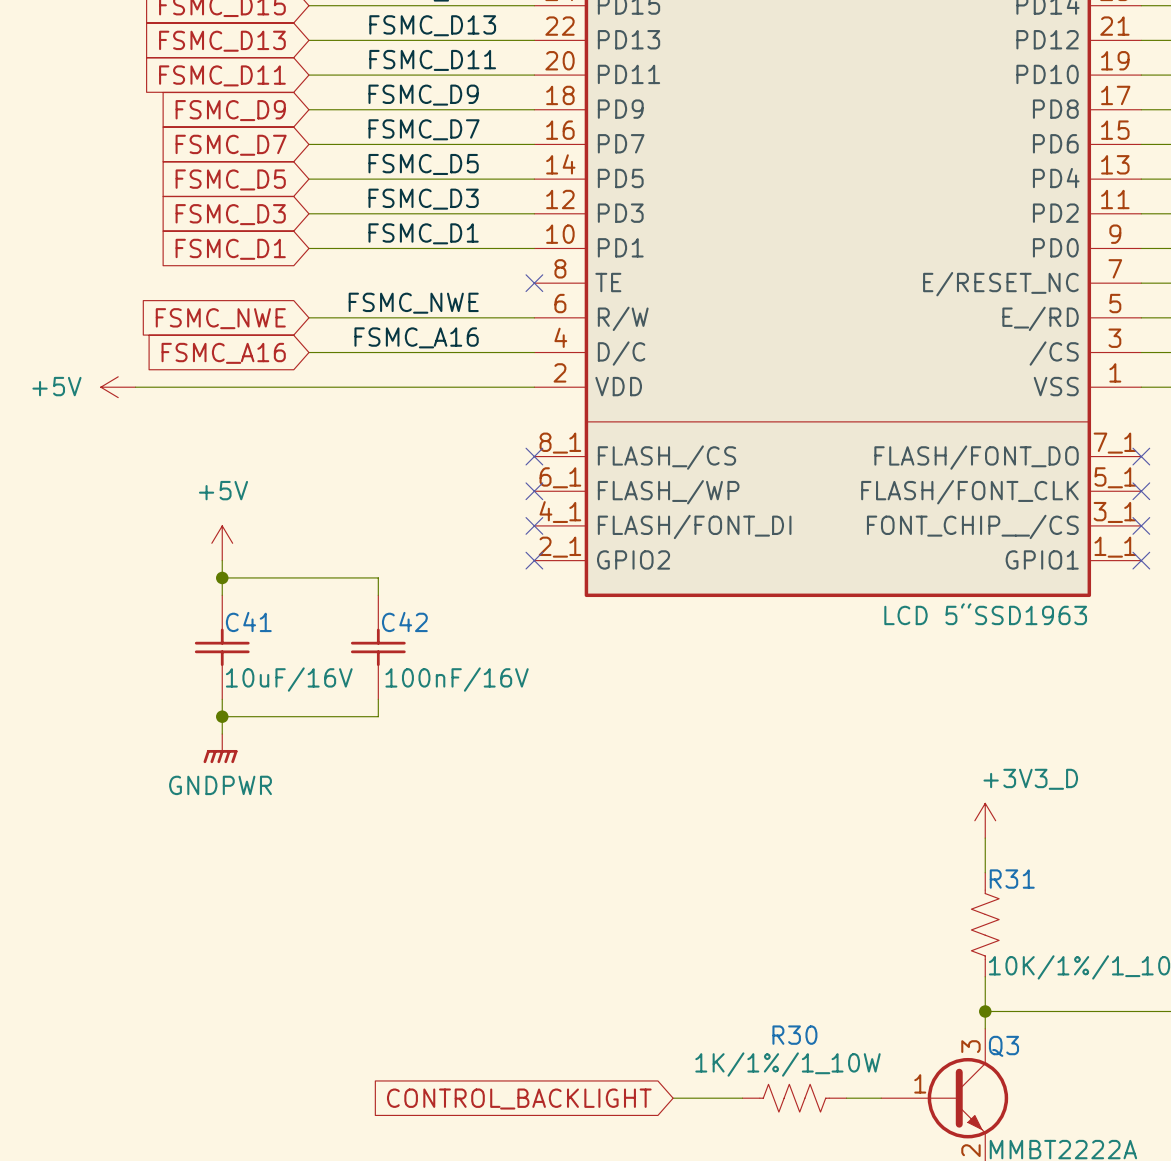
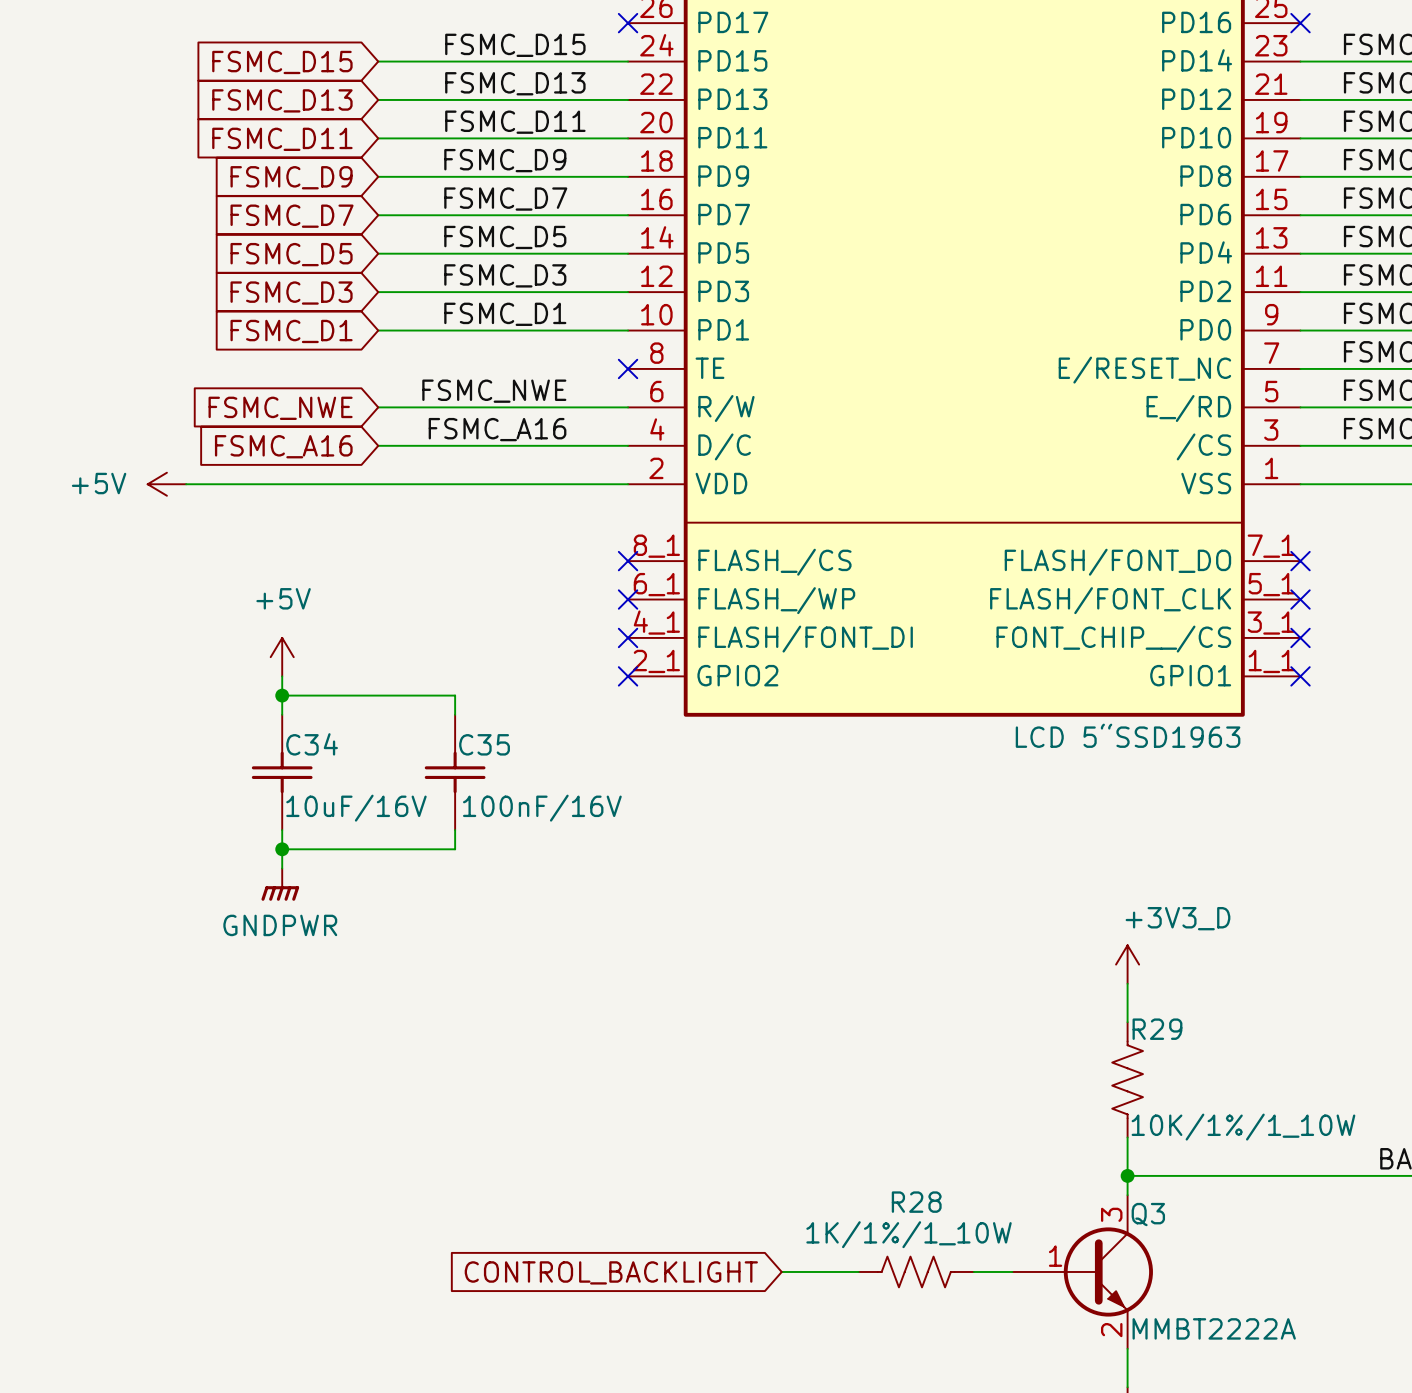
C41 name: C41 (248, 621) -> C34 (312, 744)
C42 name: C42 (404, 621) -> C35 (484, 744)
R31 name: R31 (1012, 879) -> R29 (1157, 1029)
R30 name: R30 (794, 1035) -> R28 (916, 1202)

